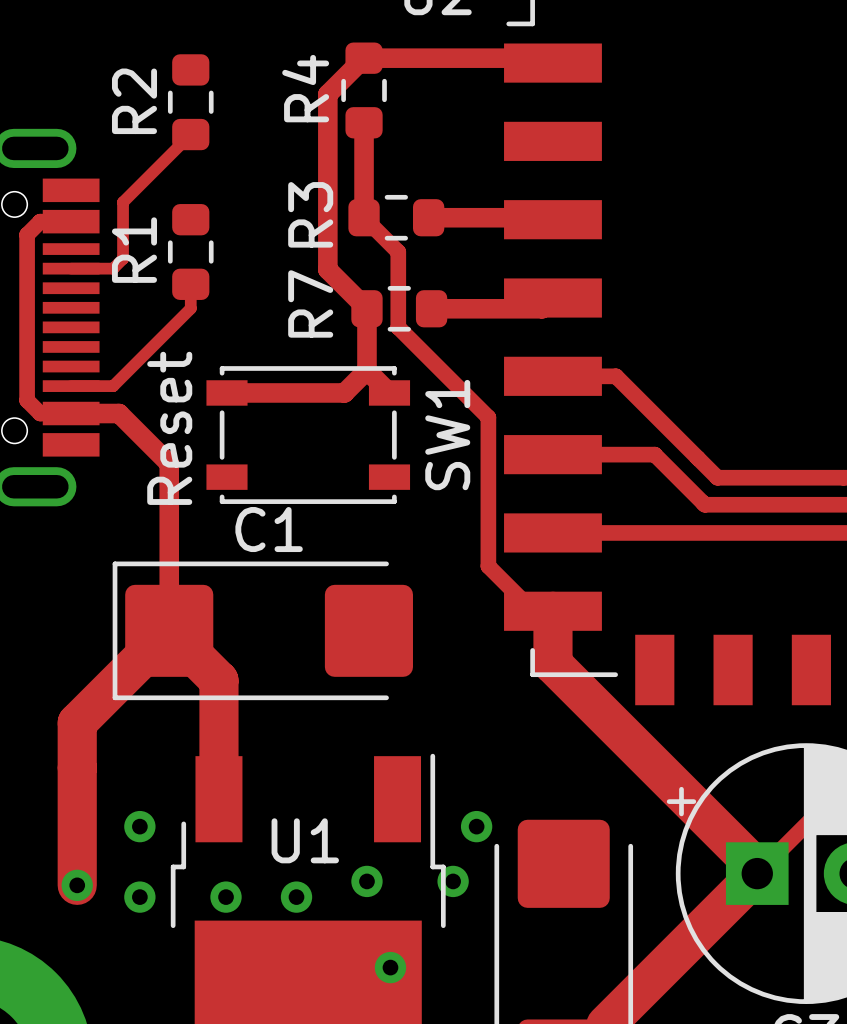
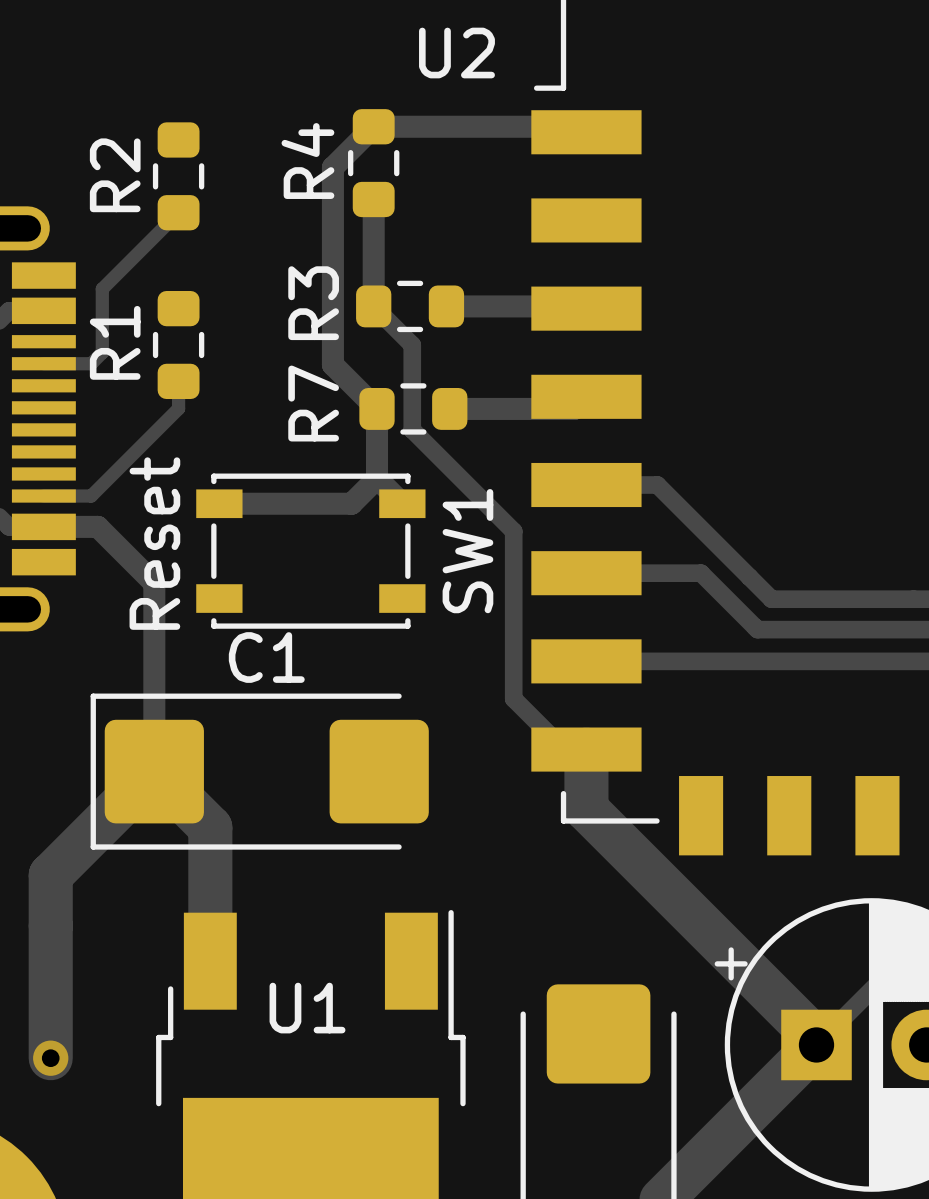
via: (139, 826) -> none
via: (476, 826) -> none
via: (366, 881) -> none
via: (453, 881) -> none
via: (139, 897) -> none
via: (226, 897) -> none
via: (296, 897) -> none
via: (390, 967) -> none

